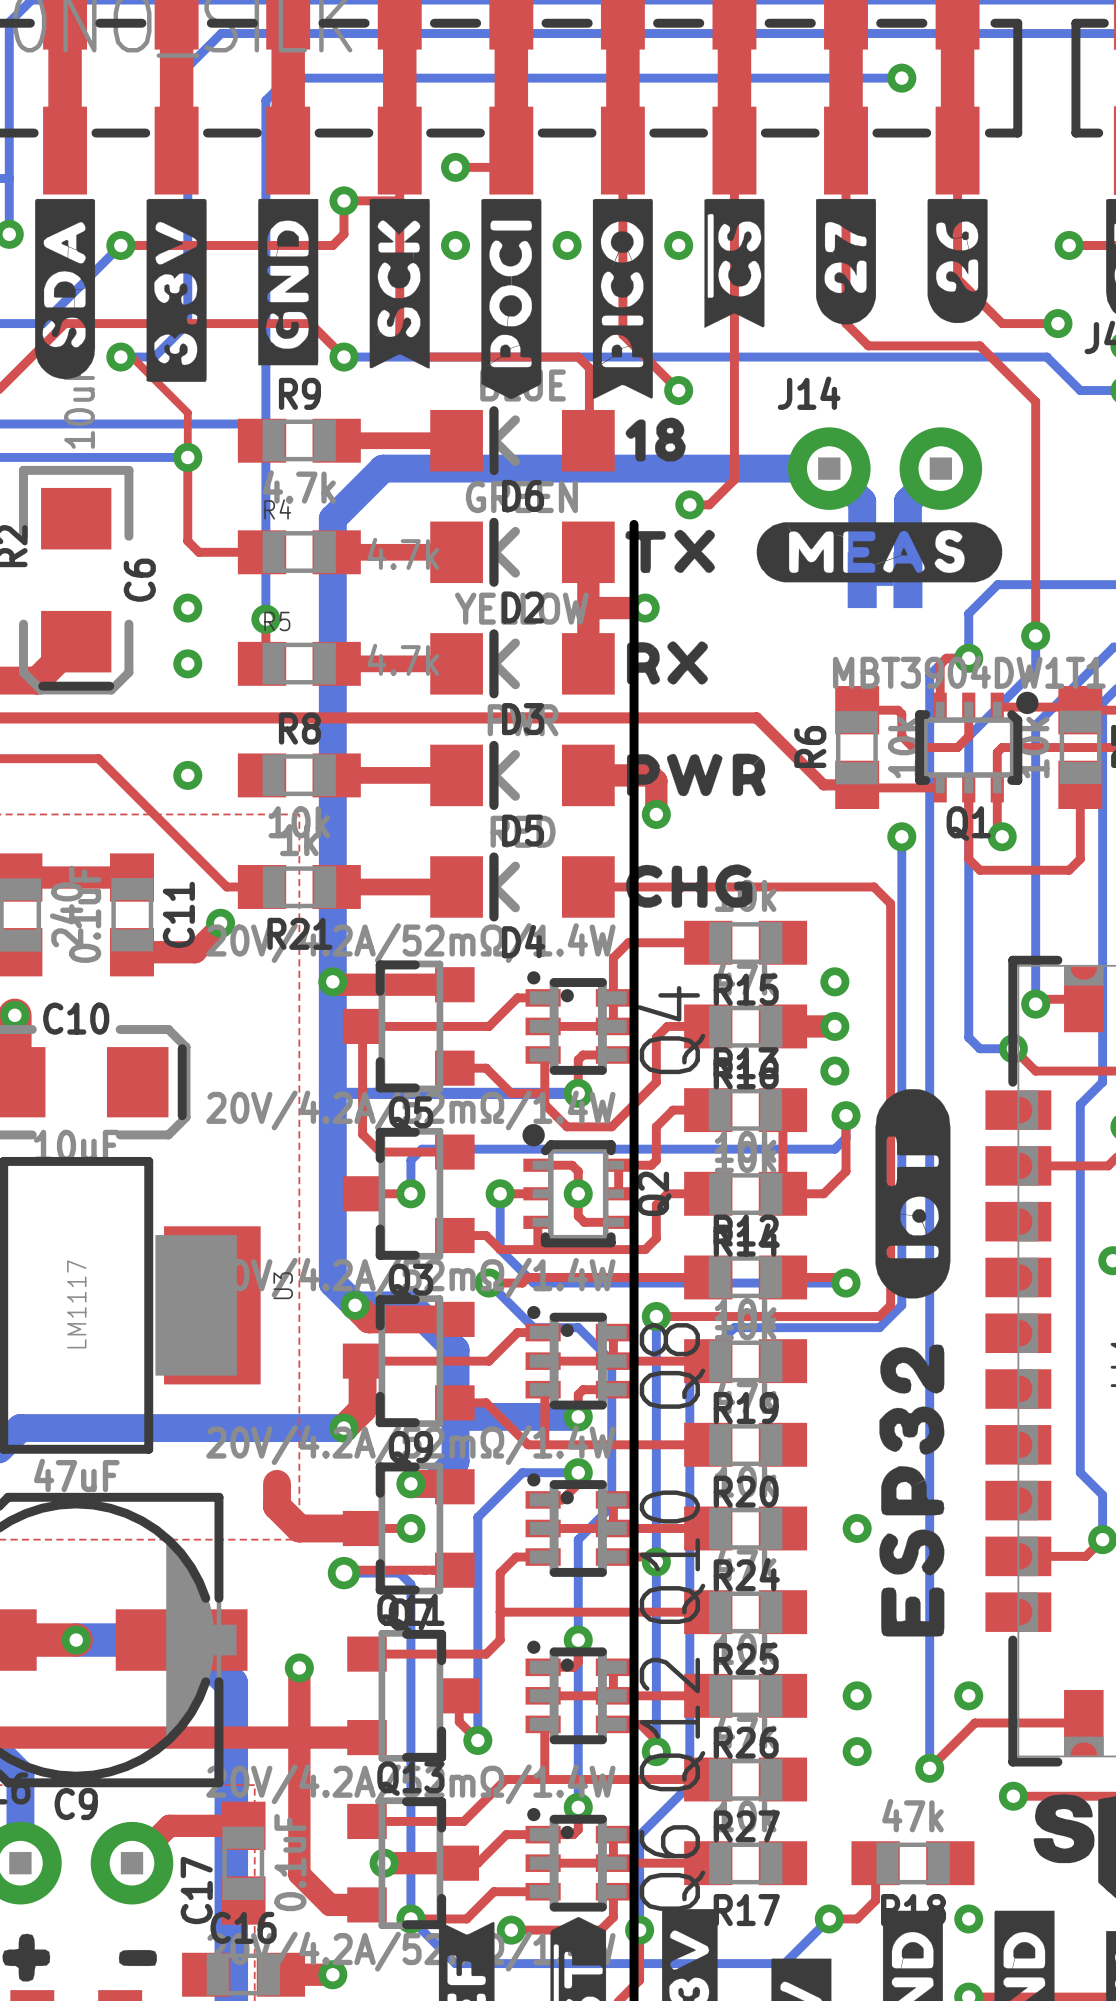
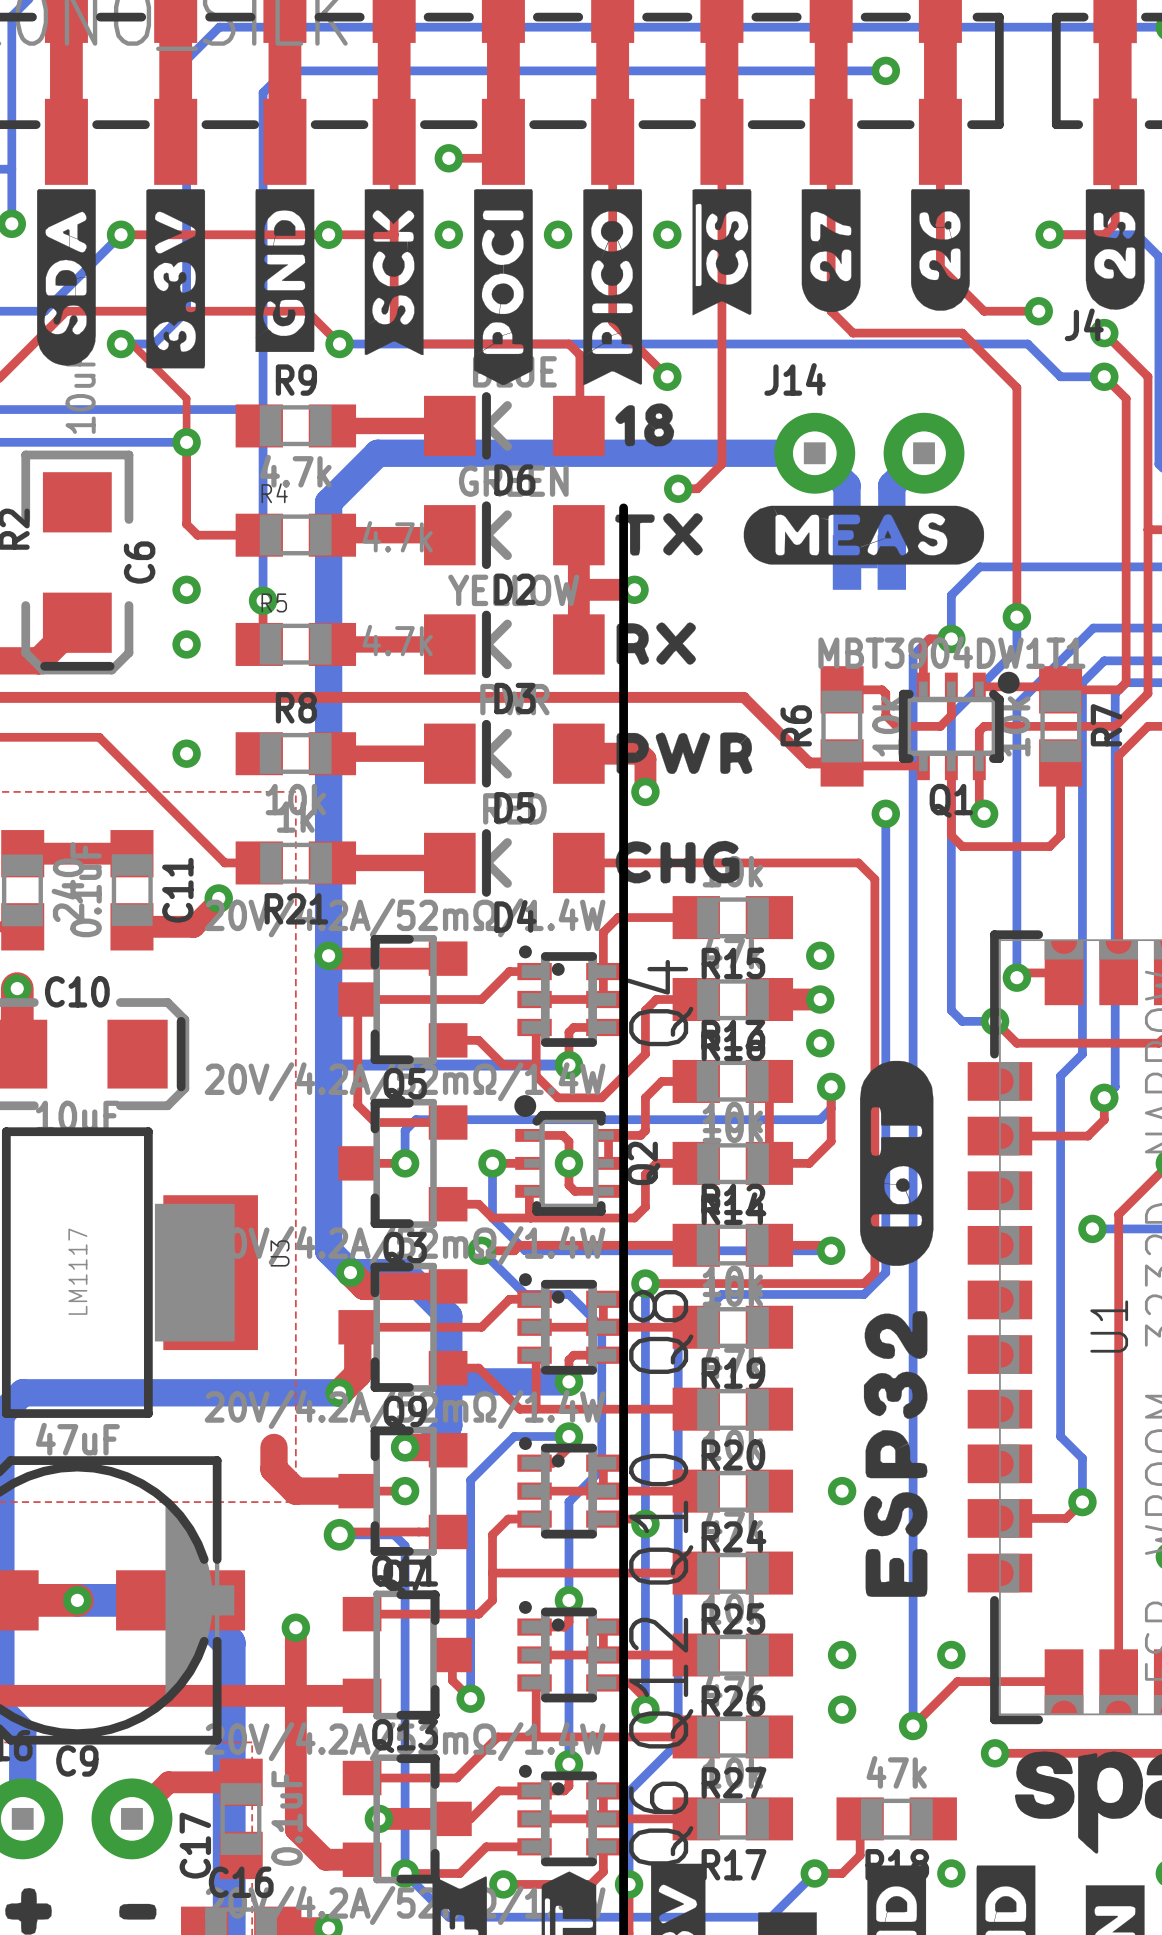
via position: (343, 200) -> (328, 234)
top track: (399, 200) (343, 200) (343, 234) (332, 245) -> (394, 234) (328, 234)

